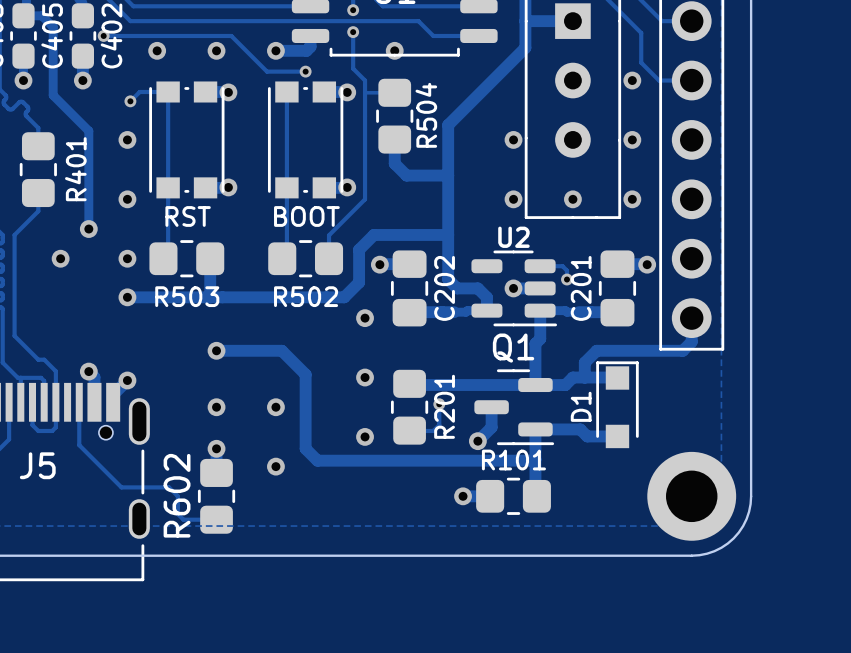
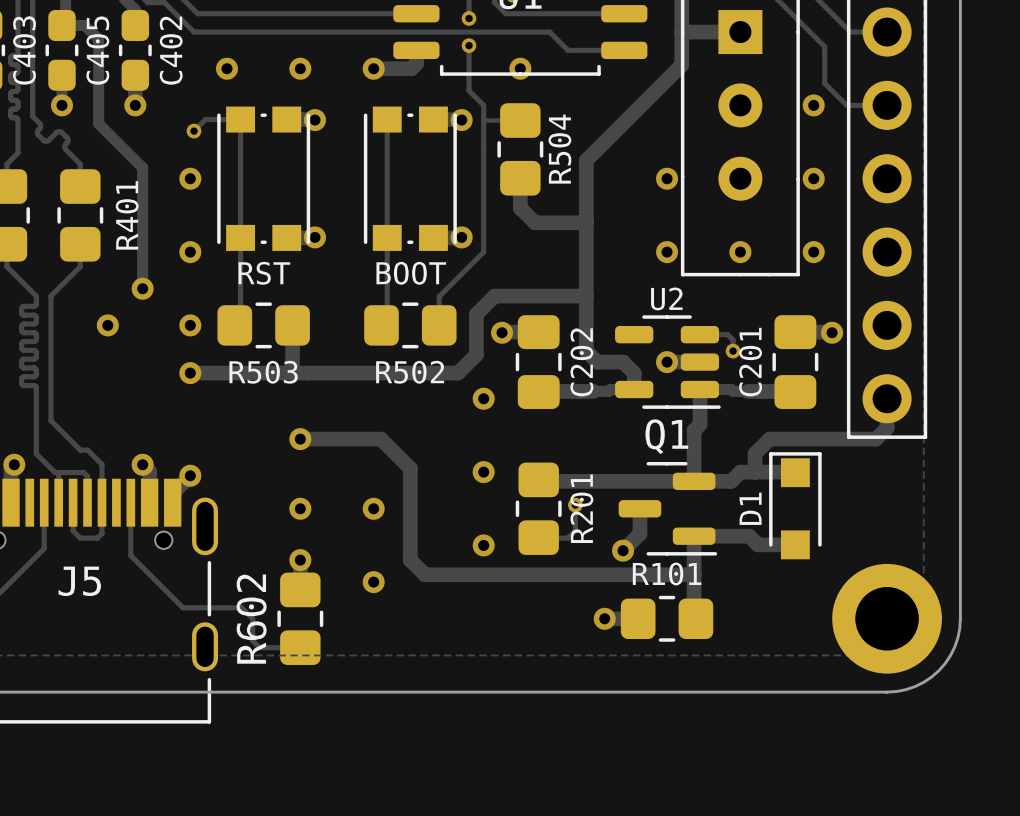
track: (103, 35) (231, 35) (267, 71) (305, 71) -> none
via: (103, 35) -> none
via: (305, 71) -> none

